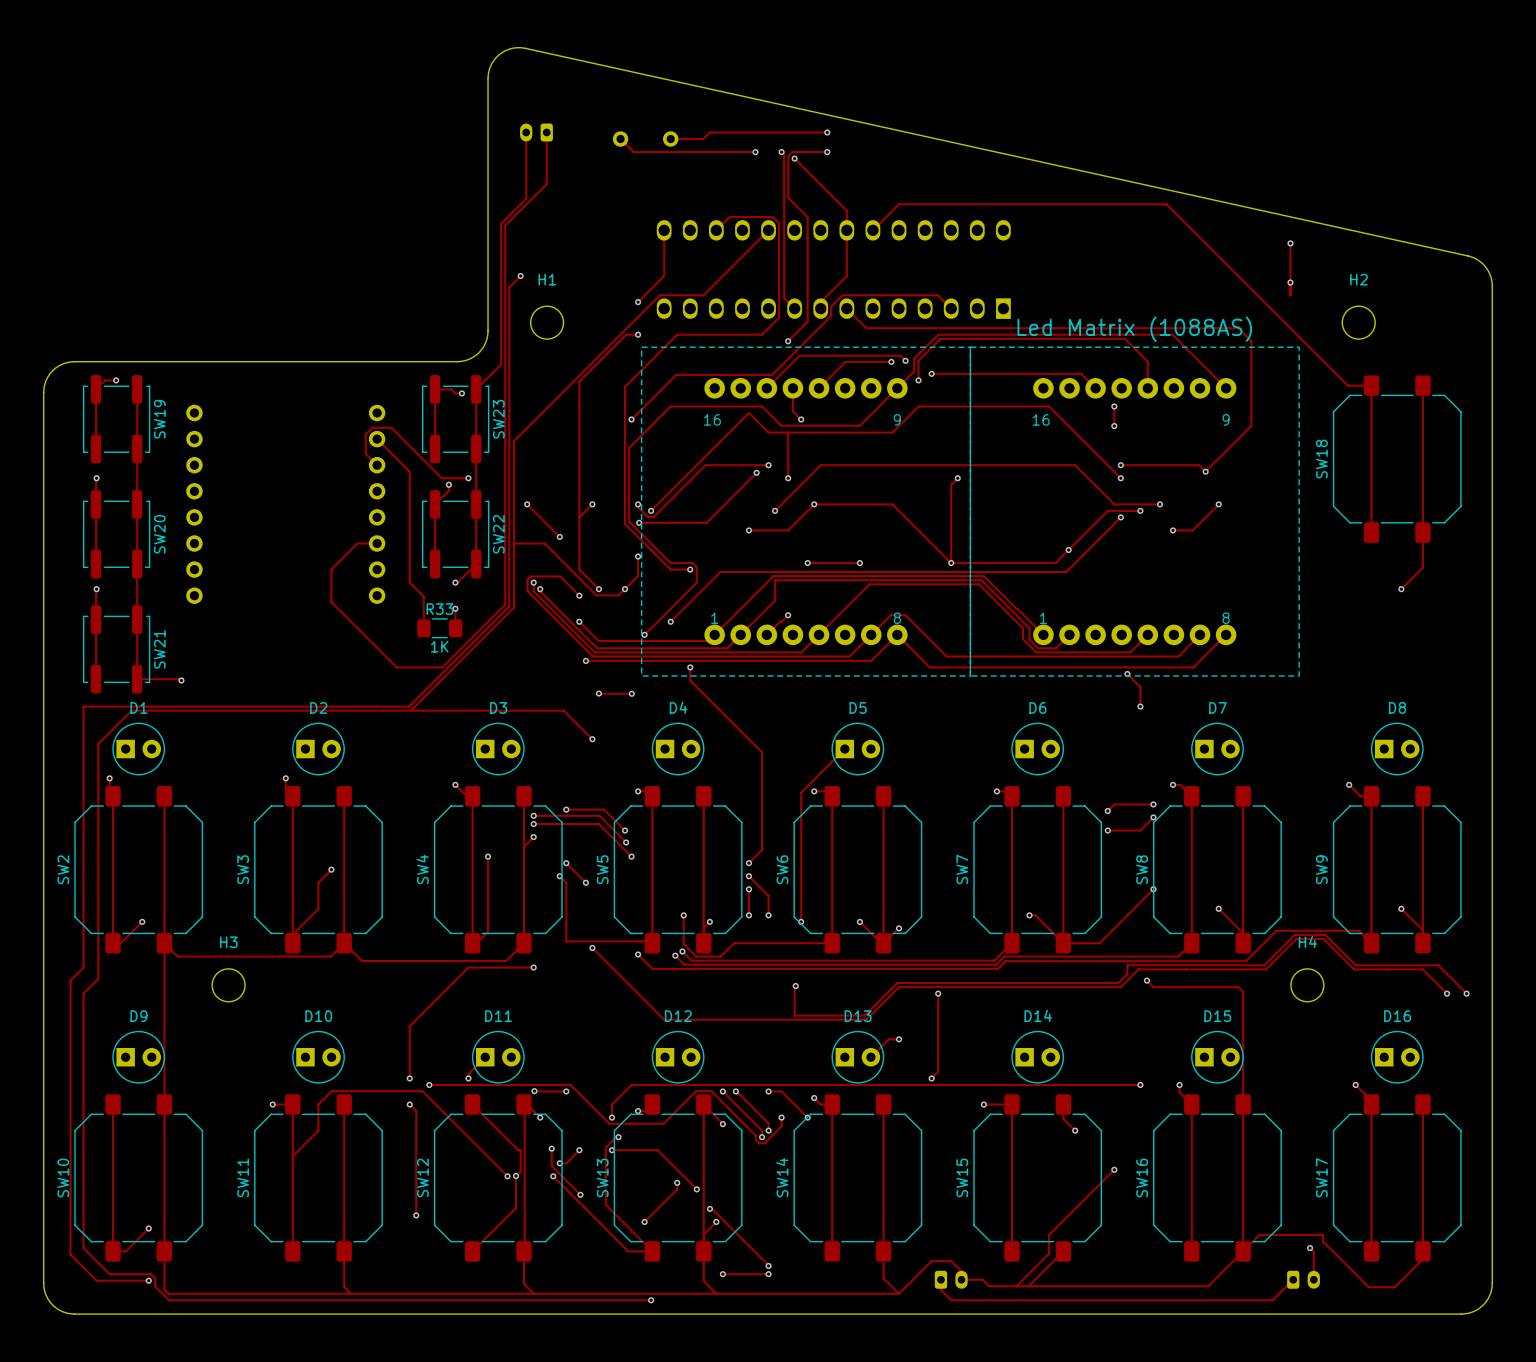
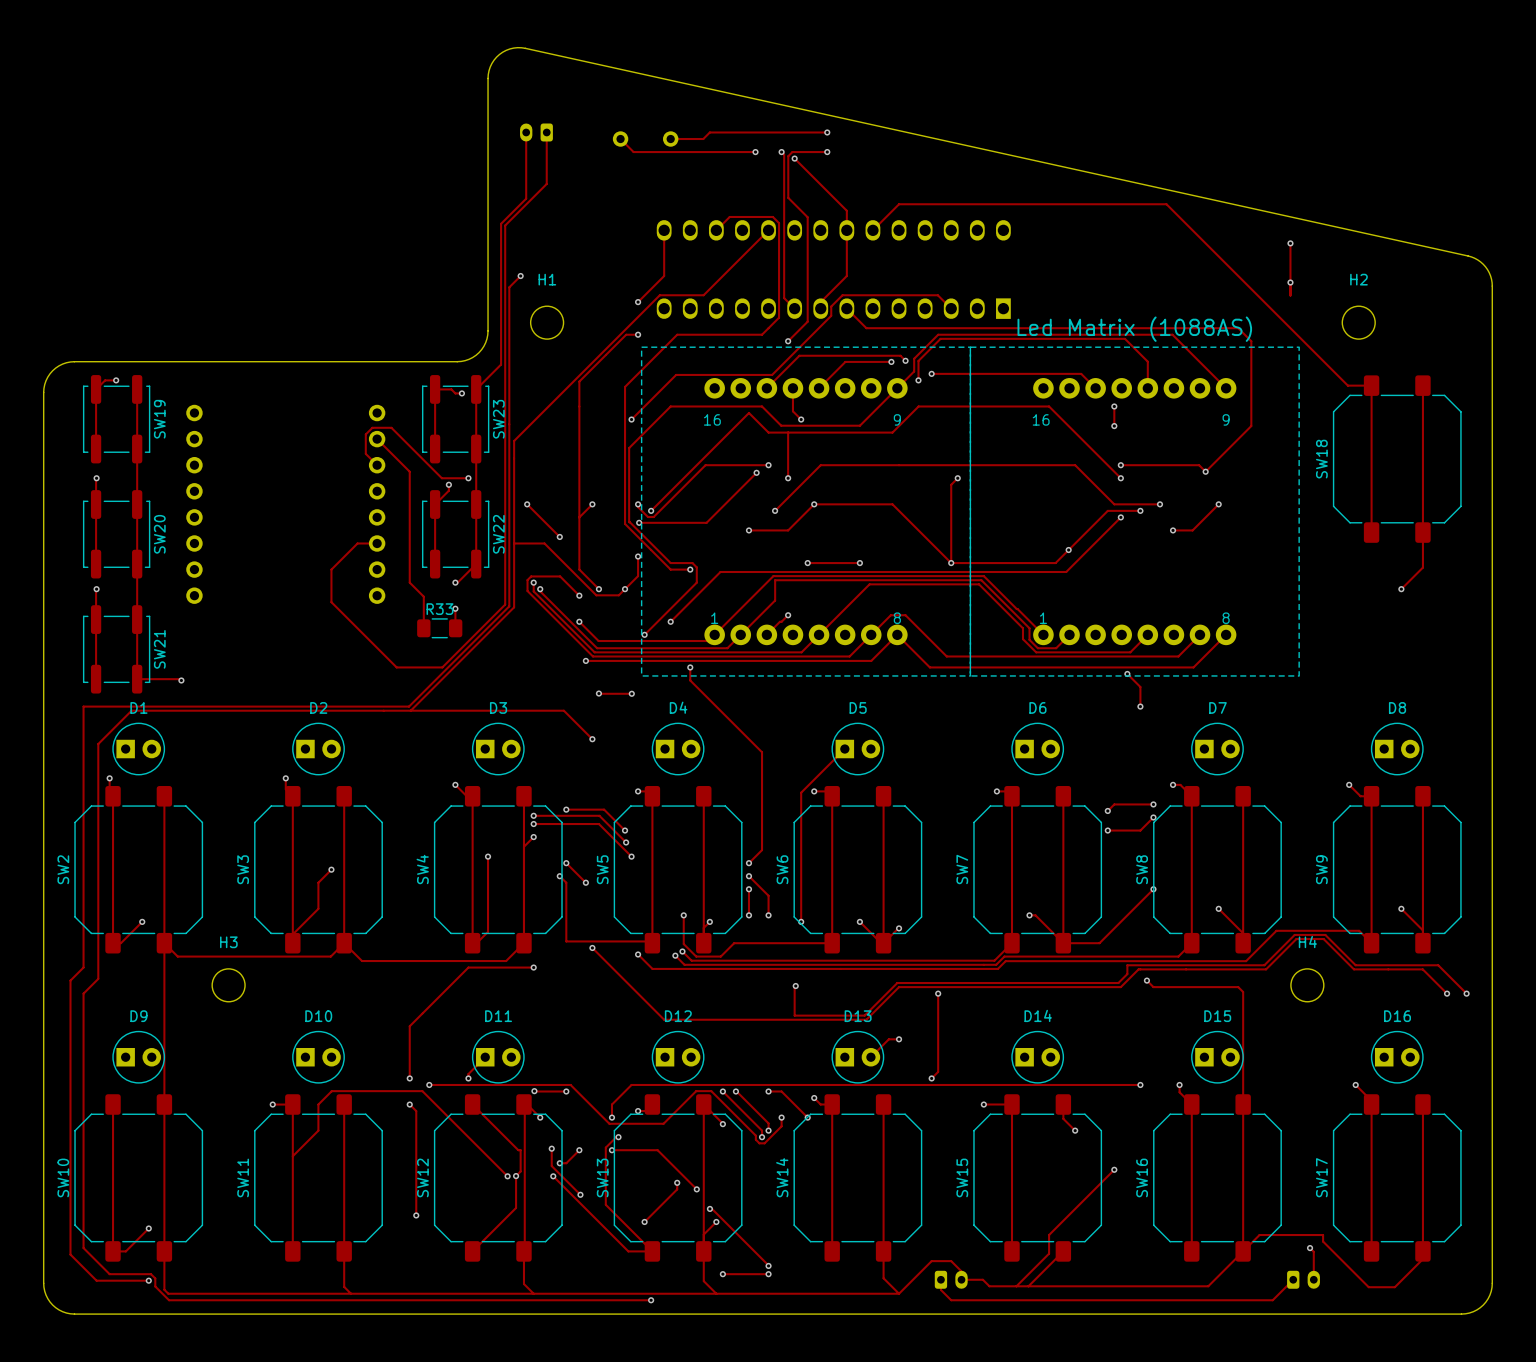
R33 value: 1K (439, 646) -> none

